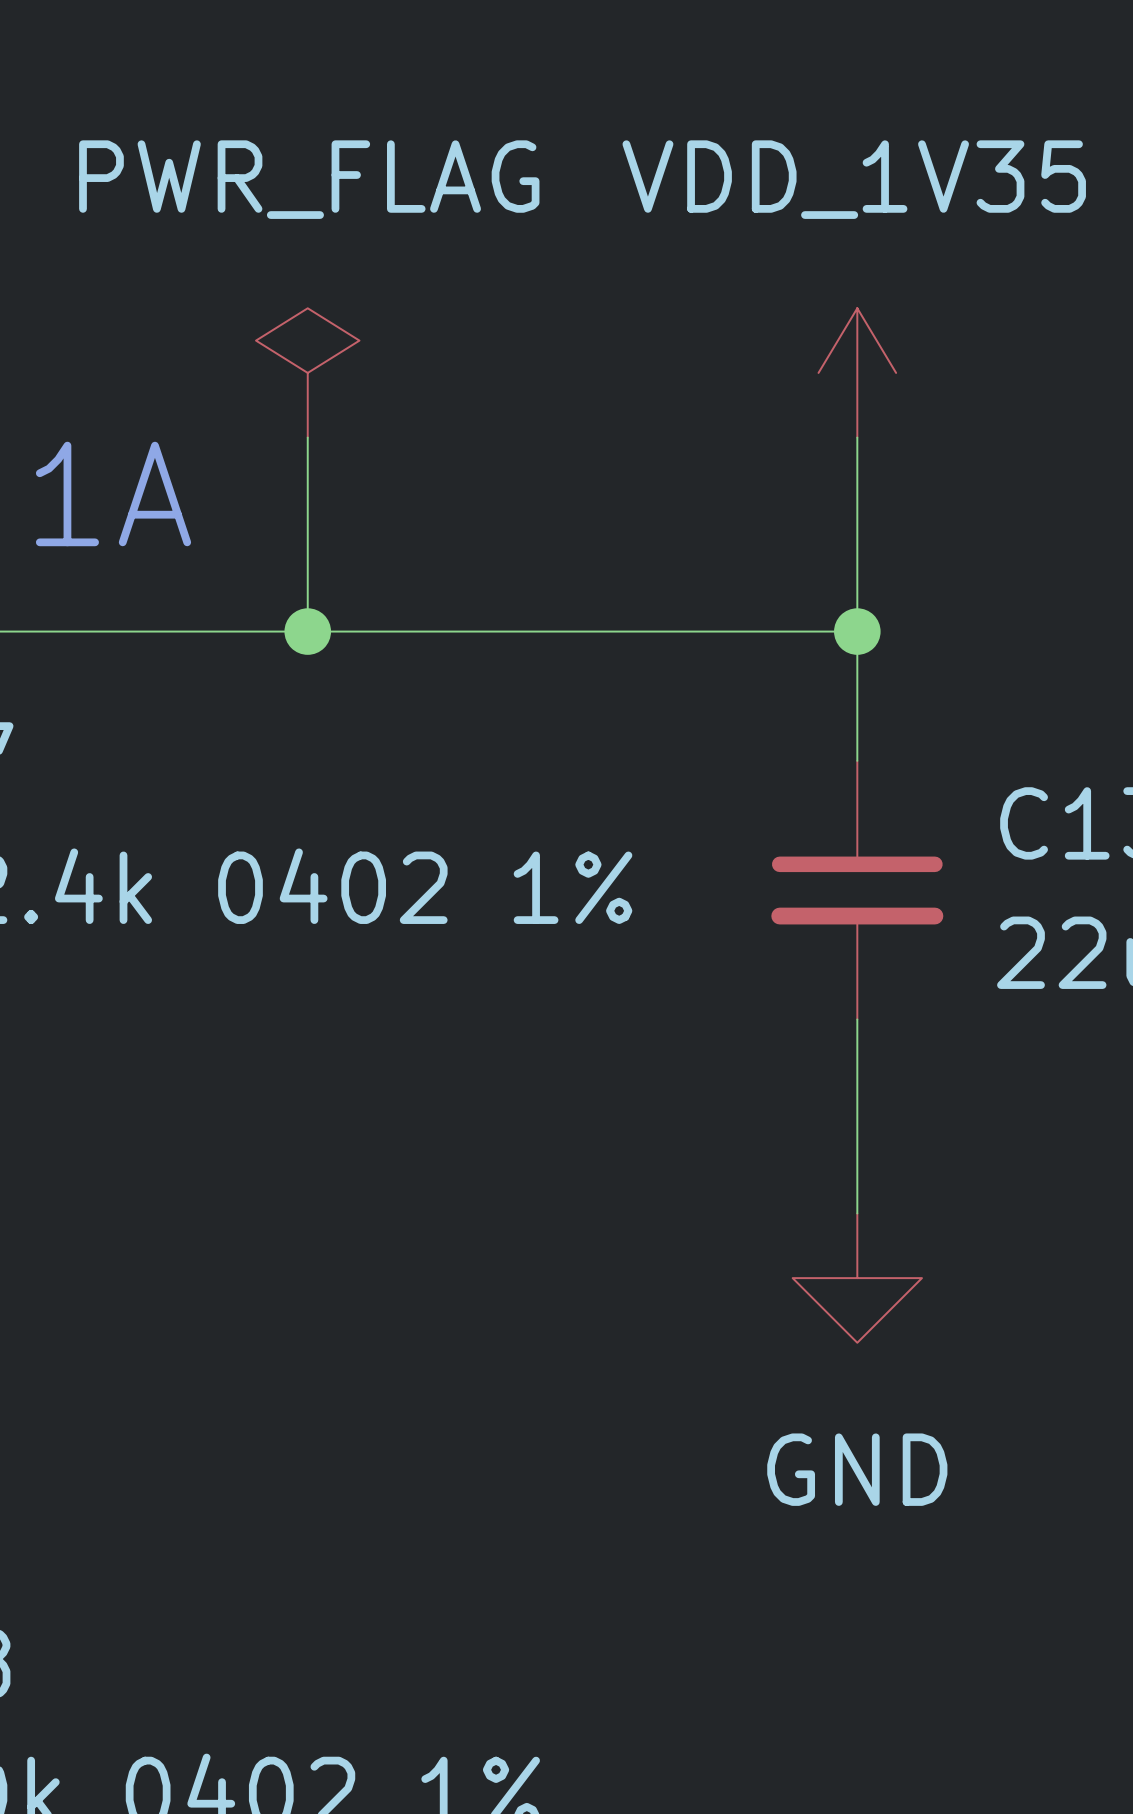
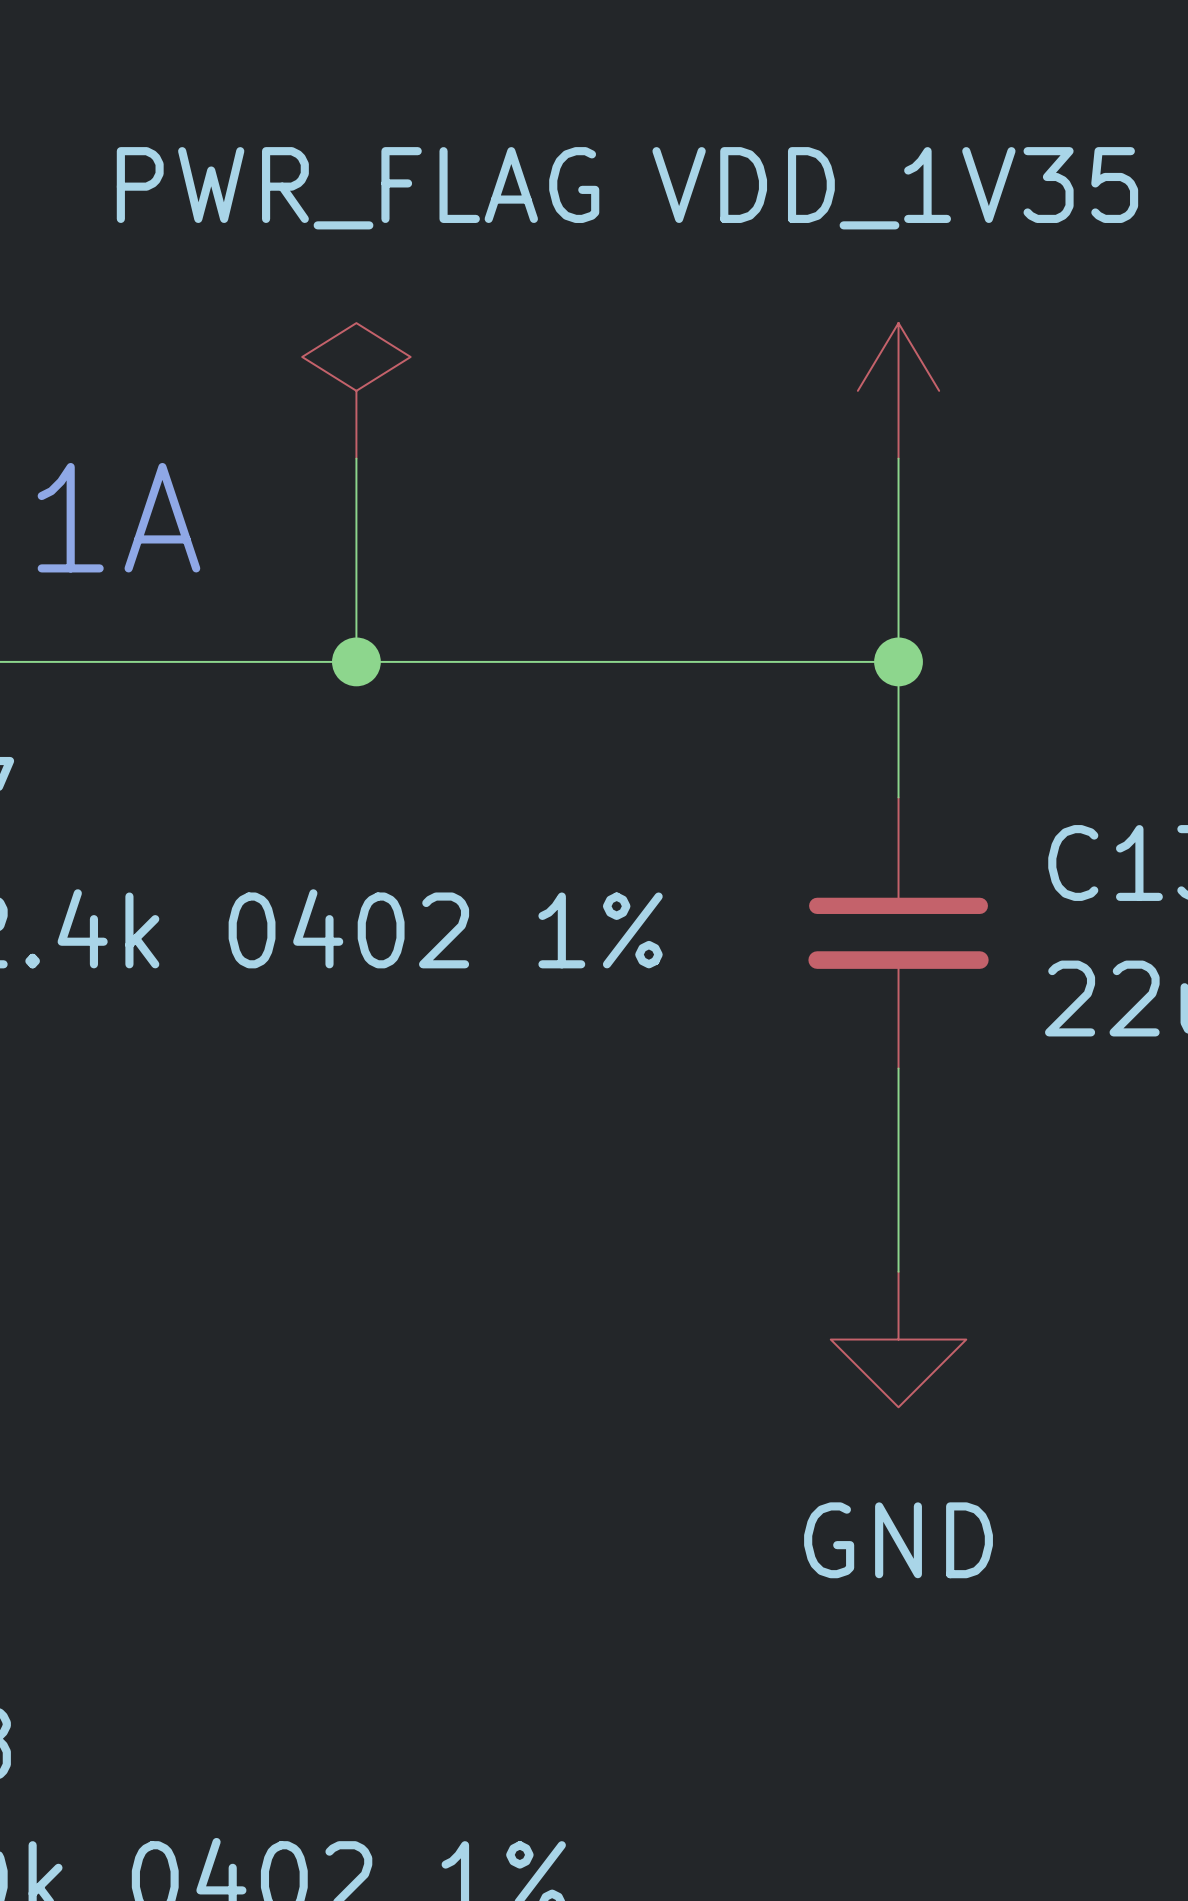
power symbol position: PWR_FLAG (307, 372) -> PWR_FLAG (356, 390)
wire: (307, 437) (307, 631) -> (356, 458) (356, 661)
junction position: (307, 631) -> (356, 661)

